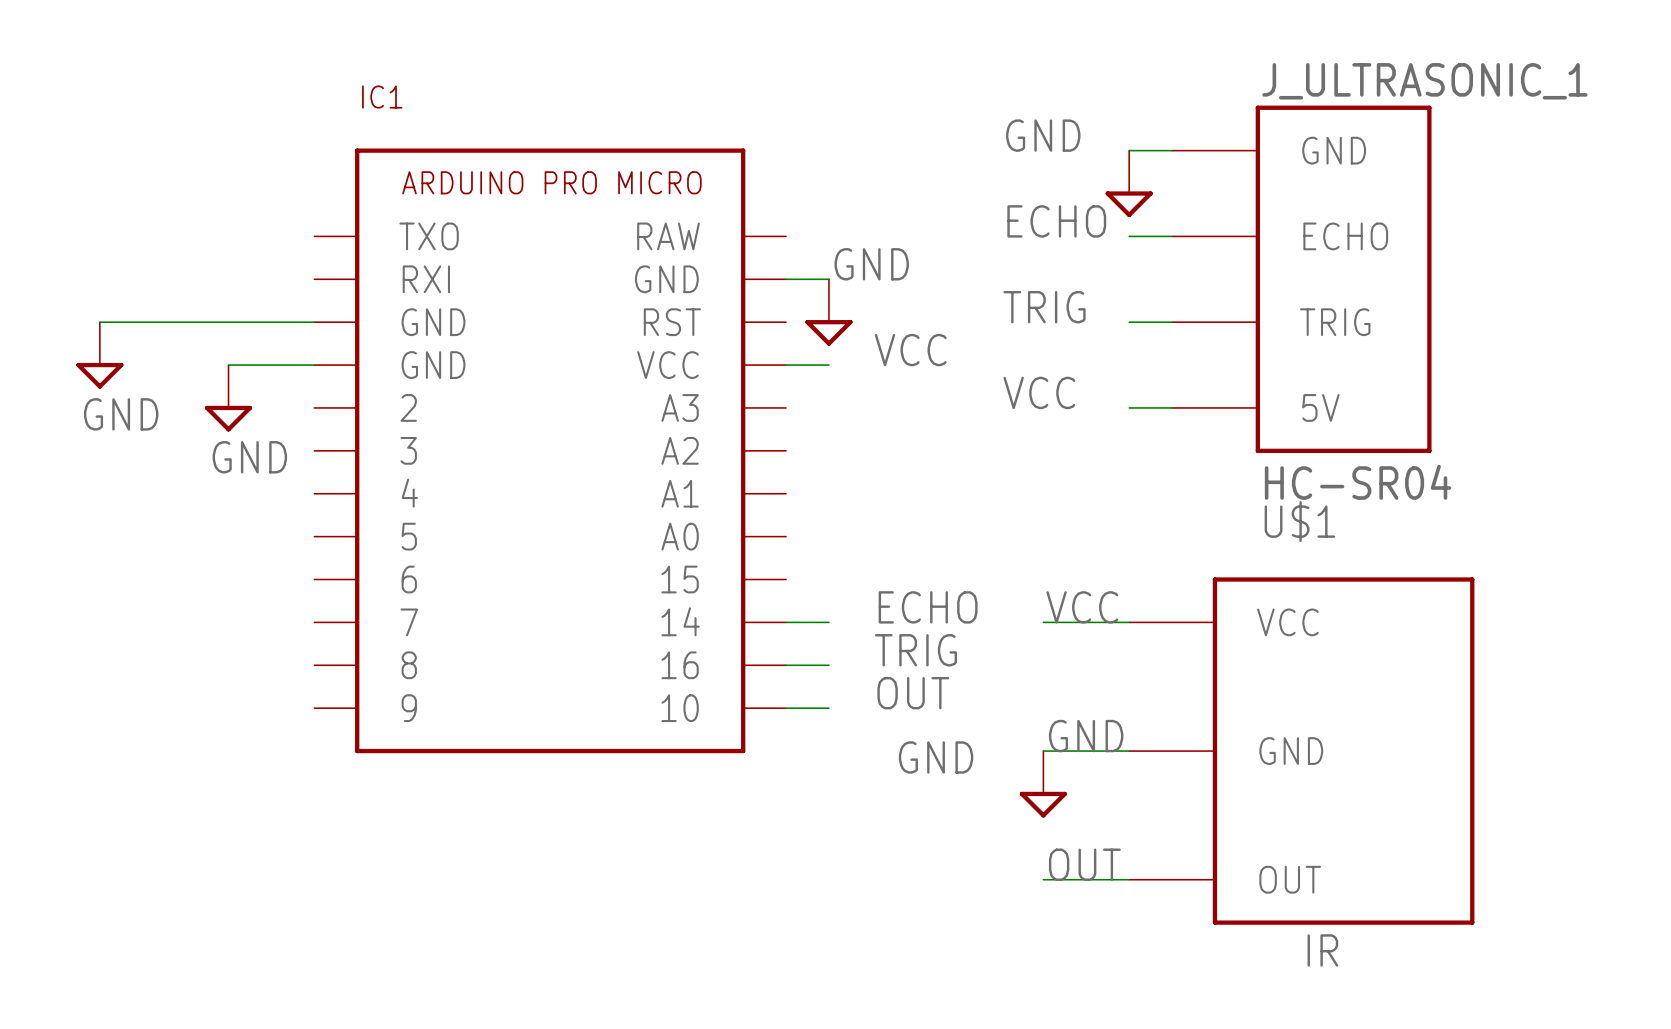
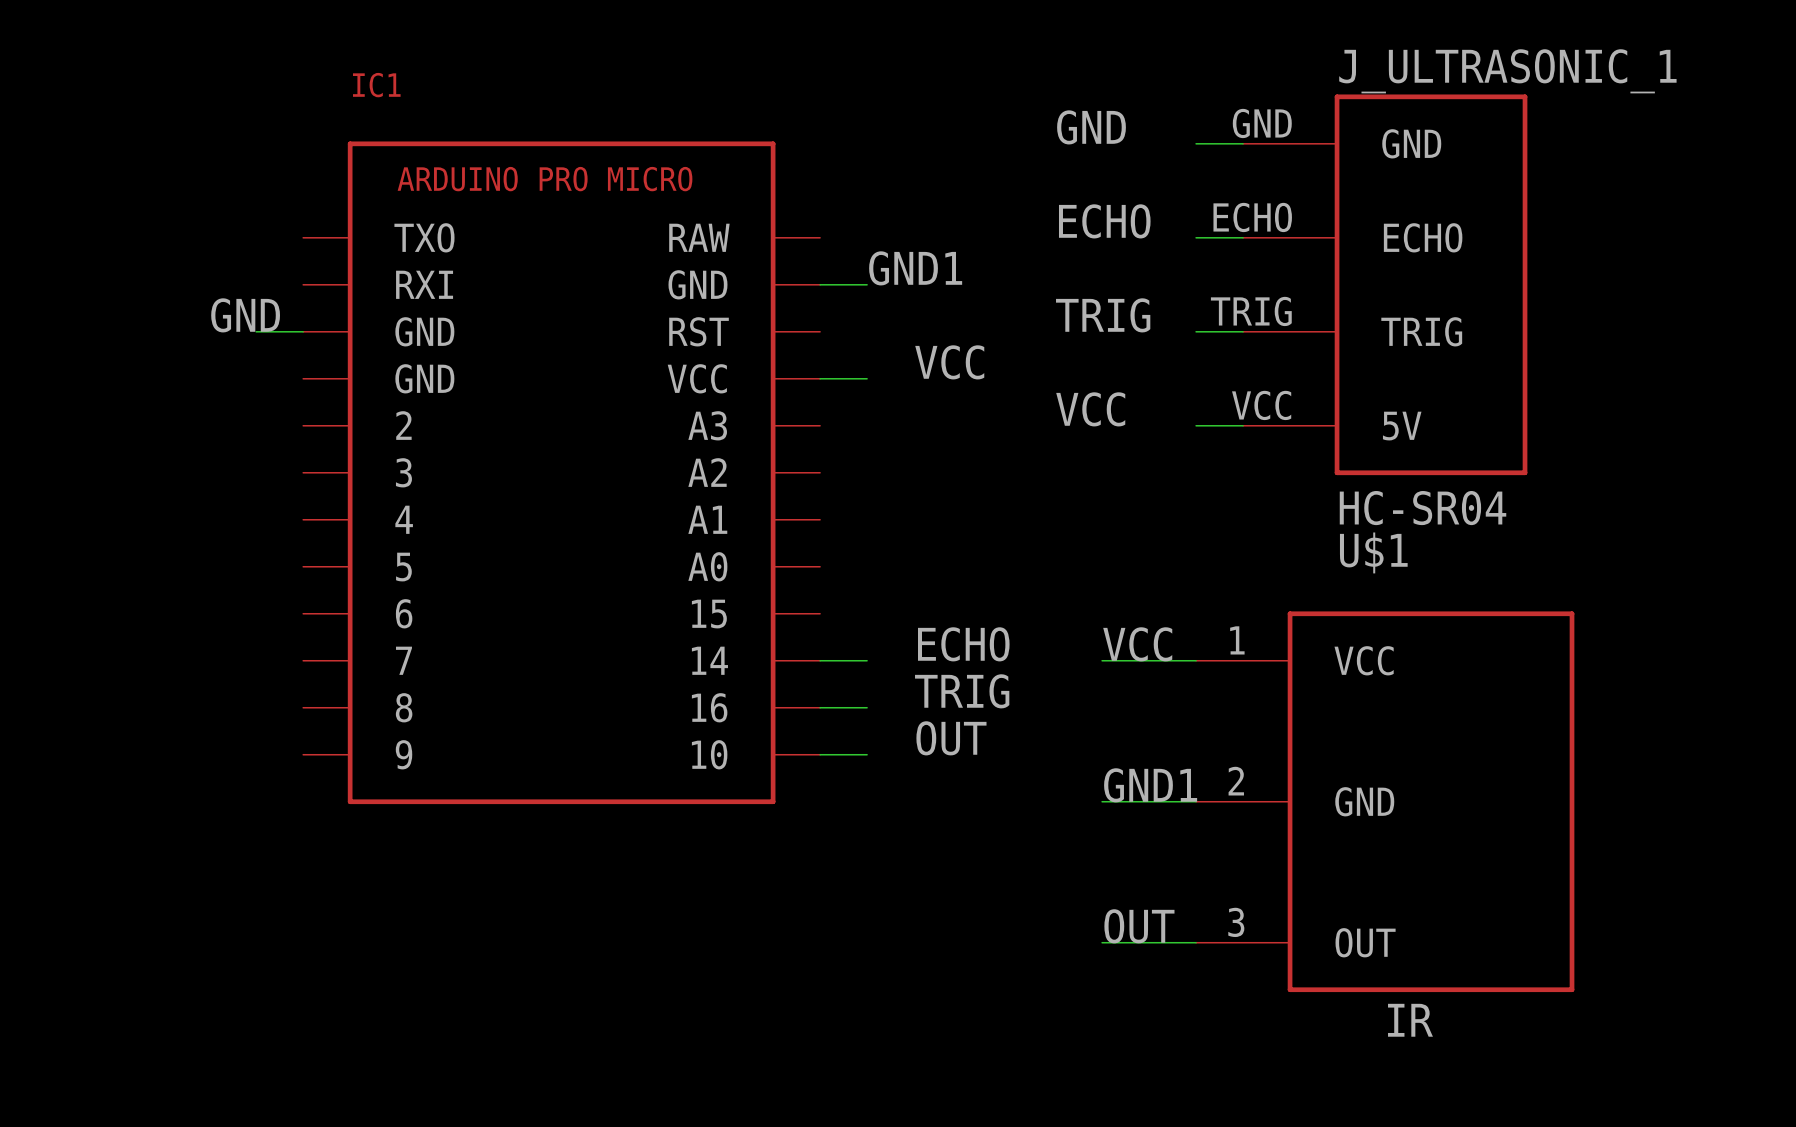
J_ULTRASONIC_1 pin number: none -> GND (1262, 123)
power symbol: (1129, 183) -> none
J_ULTRASONIC_1 pin number: none -> ECHO (1252, 217)
label: GND (871, 264) -> GND1 (915, 268)
J_ULTRASONIC_1 pin number: none -> TRIG (1251, 311)
label: none -> GND (245, 315)
power symbol: (828, 312) -> none
wire: (99, 322) (271, 322) -> none
power symbol: GND (99, 355) -> none
wire: (228, 365) (314, 365) -> none
J_ULTRASONIC_1 pin number: none -> VCC (1261, 405)
power symbol: GND (228, 398) -> none
U$1 pin number: none -> 1 (1237, 640)
U$1 pin number: none -> 2 (1236, 781)
label: GND (1086, 736) -> GND1 (1150, 785)
power symbol: GND (1043, 784) -> none
U$1 pin number: none -> 3 (1236, 922)

